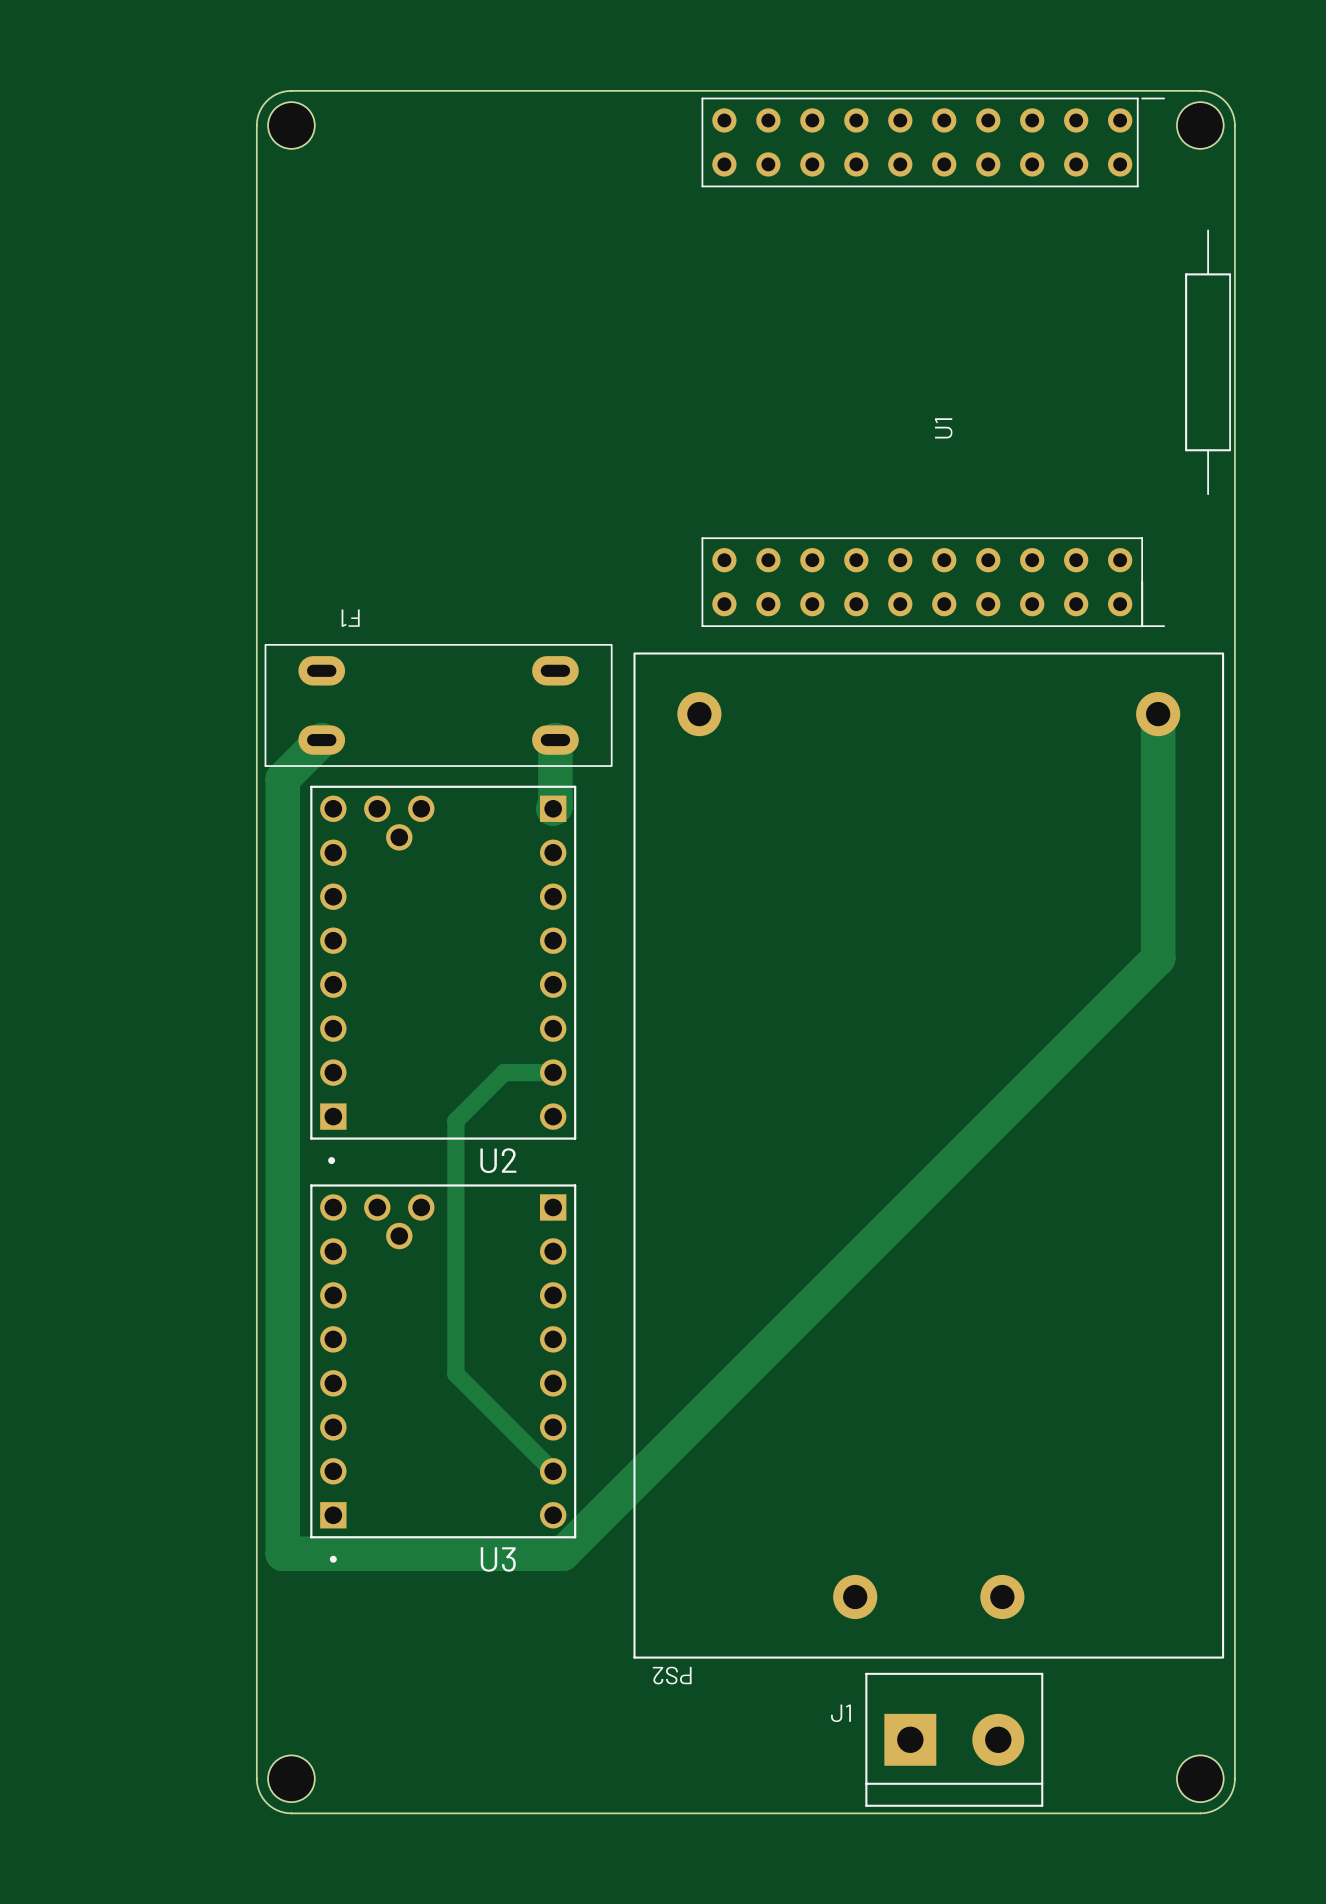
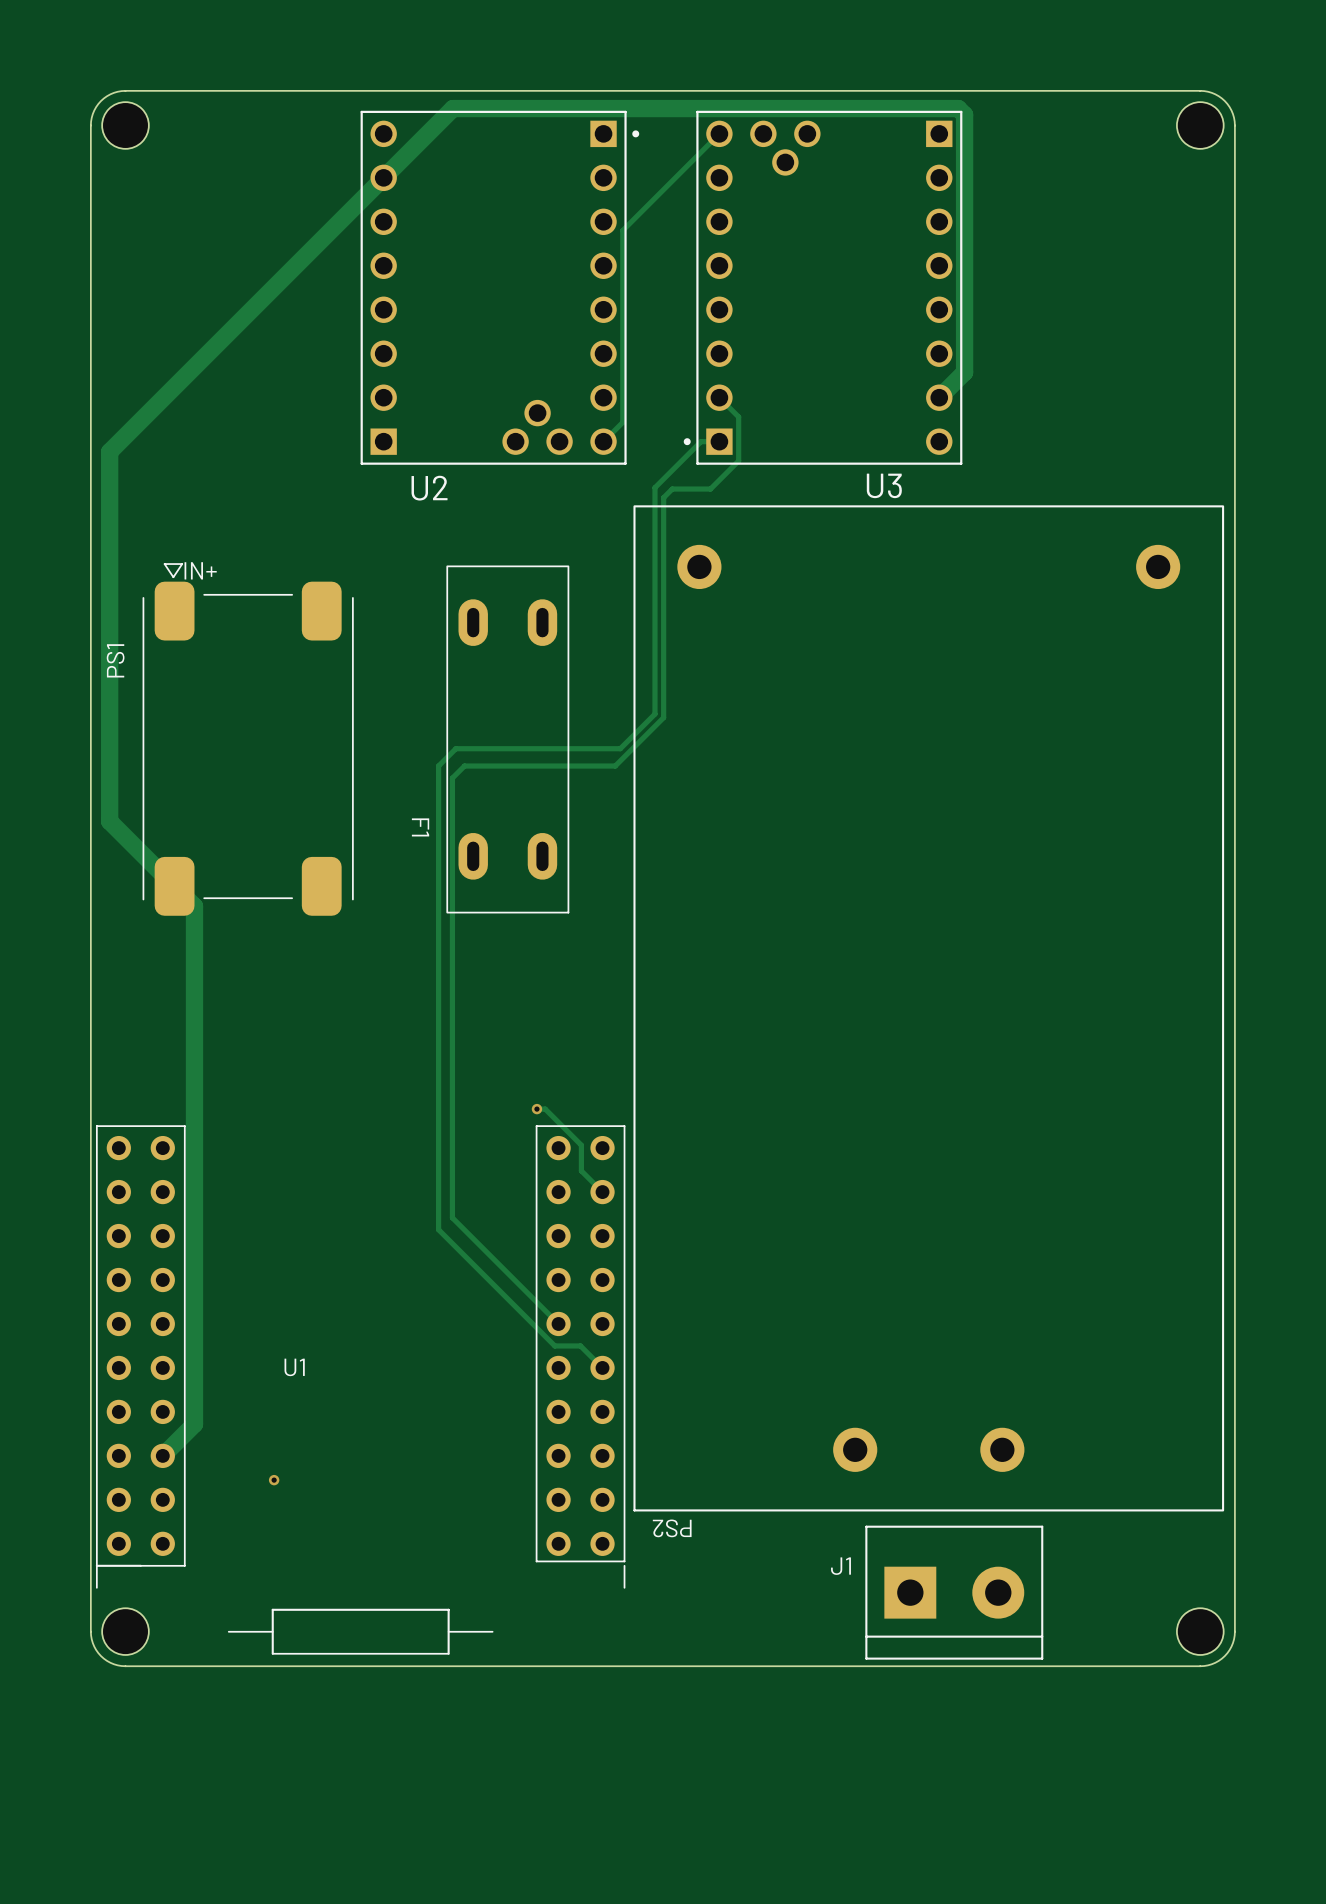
board edge: (291, 90) (276, 94) (266, 101) (260, 110) (256, 125) (256, 1778) (262, 1797) (276, 1809) (291, 1813) (1208, 1812) (1224, 1803) (1231, 1793) (1234, 1782) (1234, 1631) -> (291, 90) (121, 91) (110, 94) (101, 101) (94, 110) (91, 121) (90, 1631) (96, 1650) (110, 1662) (125, 1666) (1200, 1666) (1215, 1662) (1224, 1656) (1231, 1646) (1234, 1631)
part position: (291, 125) -> (125, 125)
track: none -> (719, 133) (622, 230) (622, 422) (603, 441)
U1 rotation: 0° (966, 362) -> 90° clockwise (360, 1390)
U1 position: (966, 362) -> (360, 1390)
track: none -> (719, 397) (738, 416) (738, 460) (710, 489) (672, 489) (663, 497) (663, 717) (615, 766) (464, 766) (452, 778) (452, 1217) (558, 1323)
track: none -> (939, 397) (964, 372) (964, 114) (958, 108) (452, 108) (109, 451) (109, 821) (194, 906) (194, 1424) (162, 1455)
track: none -> (719, 441) (701, 441) (654, 487) (654, 714) (620, 748) (455, 748) (438, 766) (438, 1229) (554, 1345) (580, 1345) (602, 1367)
F1 name position: F1 (350, 618) -> F1 (420, 827)
F1 rotation: 0° (438, 705) -> 90° clockwise (507, 739)
track: (1158, 714) (1158, 958) (562, 1553) (282, 1553) (282, 779) (321, 740) -> none
PS1: none -> (248, 739)
track: (555, 740) (555, 806) (553, 808) -> none
U2 footprint: [310, 785, 577, 1165] -> [360, 110, 640, 465]
track: (553, 1072) (504, 1072) (455, 1120) (455, 1374) (553, 1471) -> none
track: none -> (536, 1109) (545, 1109) (581, 1145) (581, 1170) (602, 1192)
via: none -> (536, 1109)
PS2 position: (928, 1155) -> (928, 1008)
U2 name position: U2 (498, 1160) -> U2 (429, 488)
U3 footprint: [310, 1184, 577, 1563] -> [683, 110, 963, 465]
via: none -> (274, 1480)
J1 position: (954, 1739) -> (954, 1592)
part position: (291, 1778) -> (125, 1631)
part position: (1200, 1778) -> (1200, 1631)

